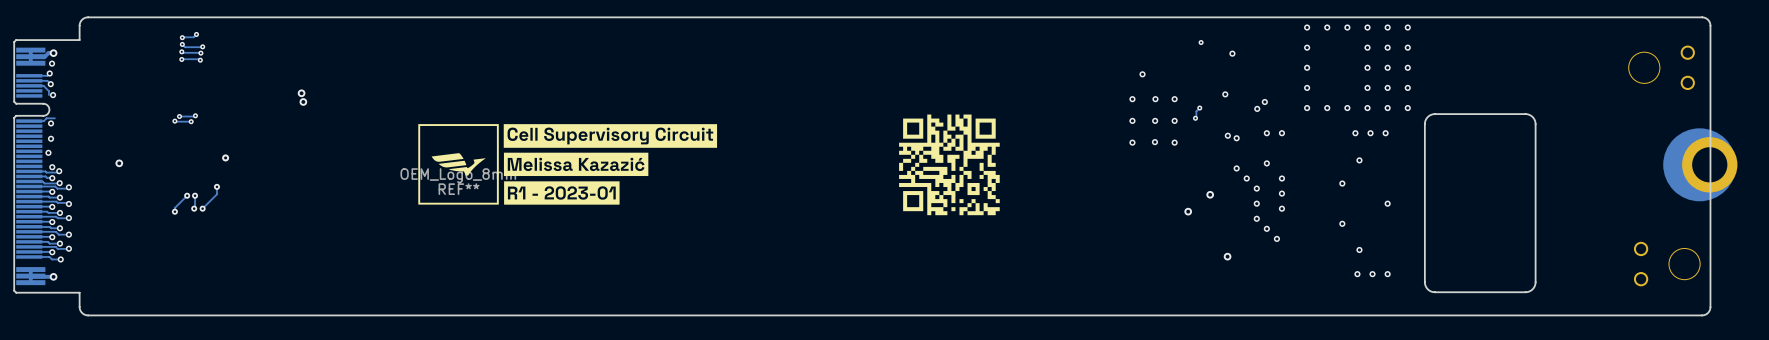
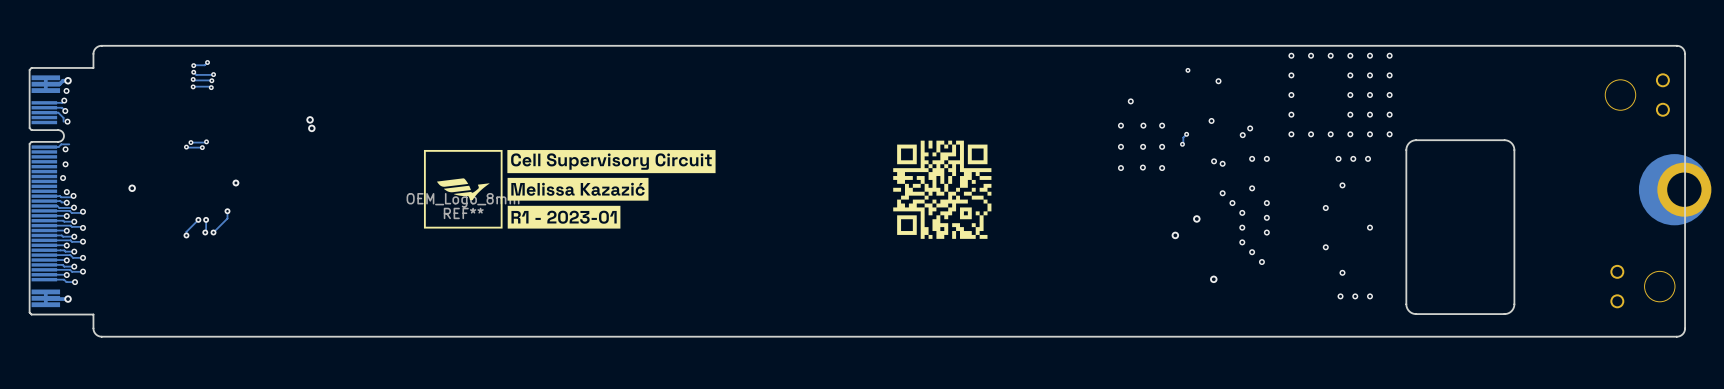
drawing shape: [899, 114, 1000, 216] -> [893, 140, 992, 239]

